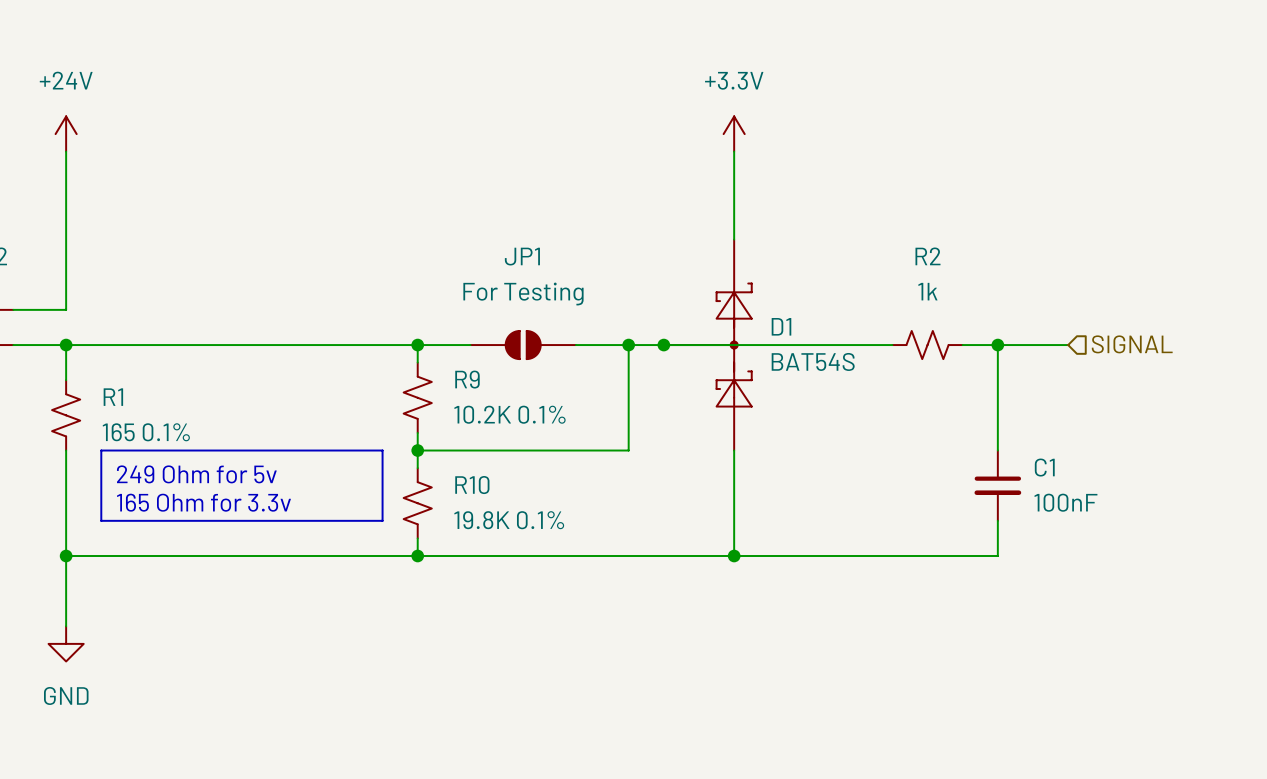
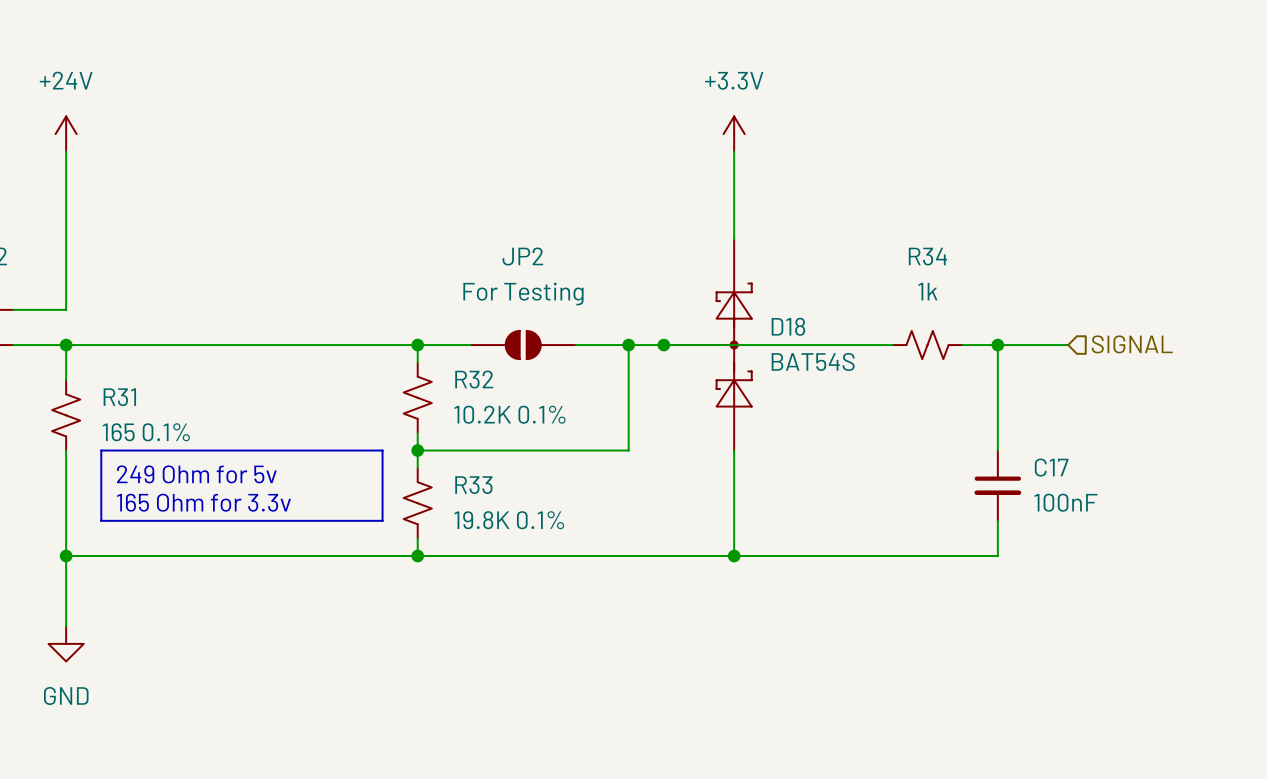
JP1 name: JP1 (522, 256) -> JP2 (522, 256)
R2 name: R2 (927, 256) -> R34 (927, 256)
D1 name: D1 (781, 326) -> D18 (788, 326)
R9 name: R9 (467, 379) -> R32 (474, 379)
R1 name: R1 (113, 397) -> R31 (119, 397)
C1 name: C1 (1044, 467) -> C17 (1051, 467)
R10 name: R10 (472, 485) -> R33 (473, 485)

